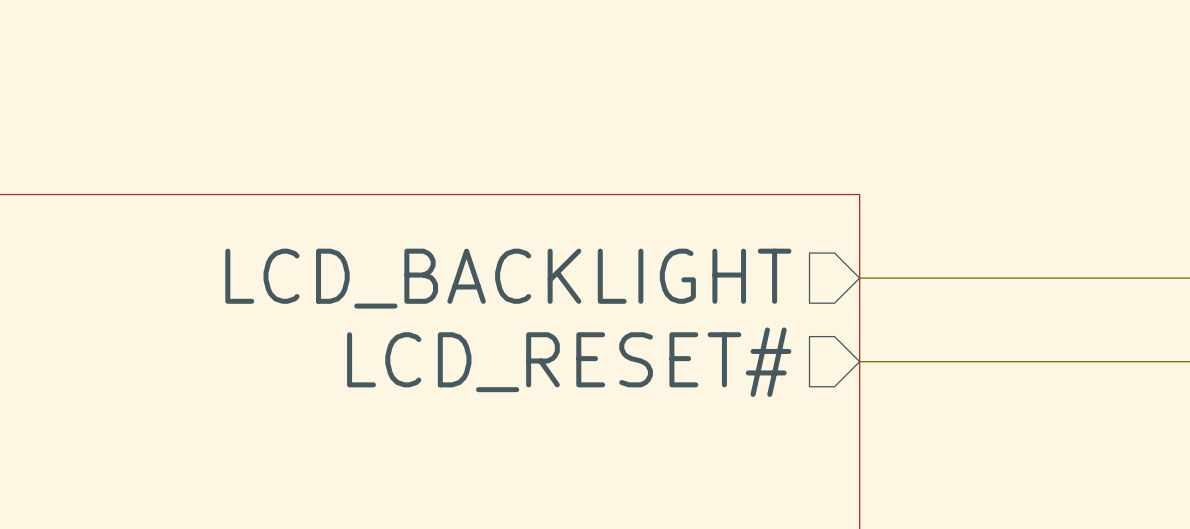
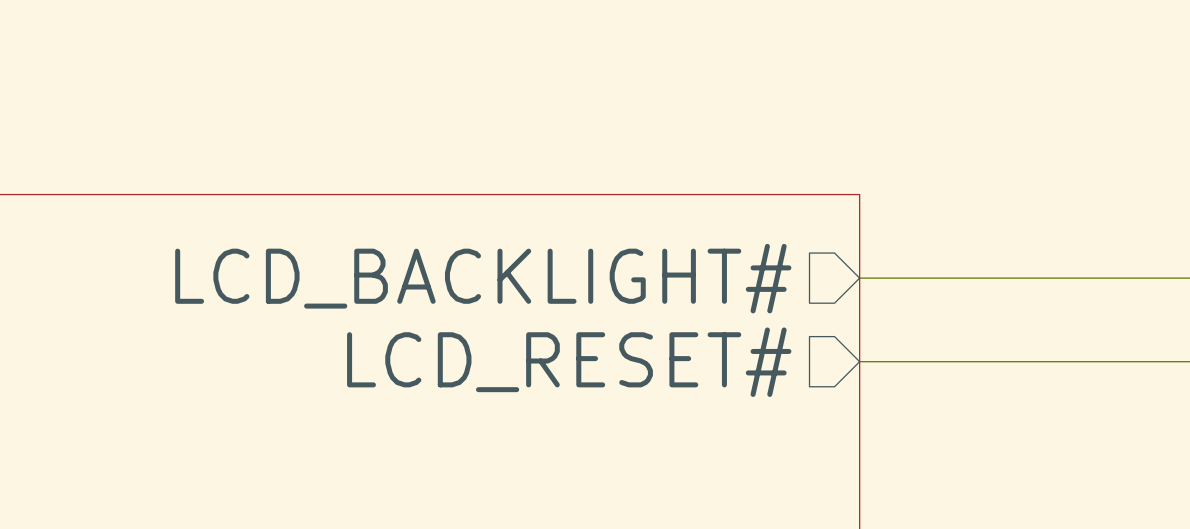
sheet pin: LCD_BACKLIGHT (508, 278) -> LCD_BACKLIGHT# (483, 278)

